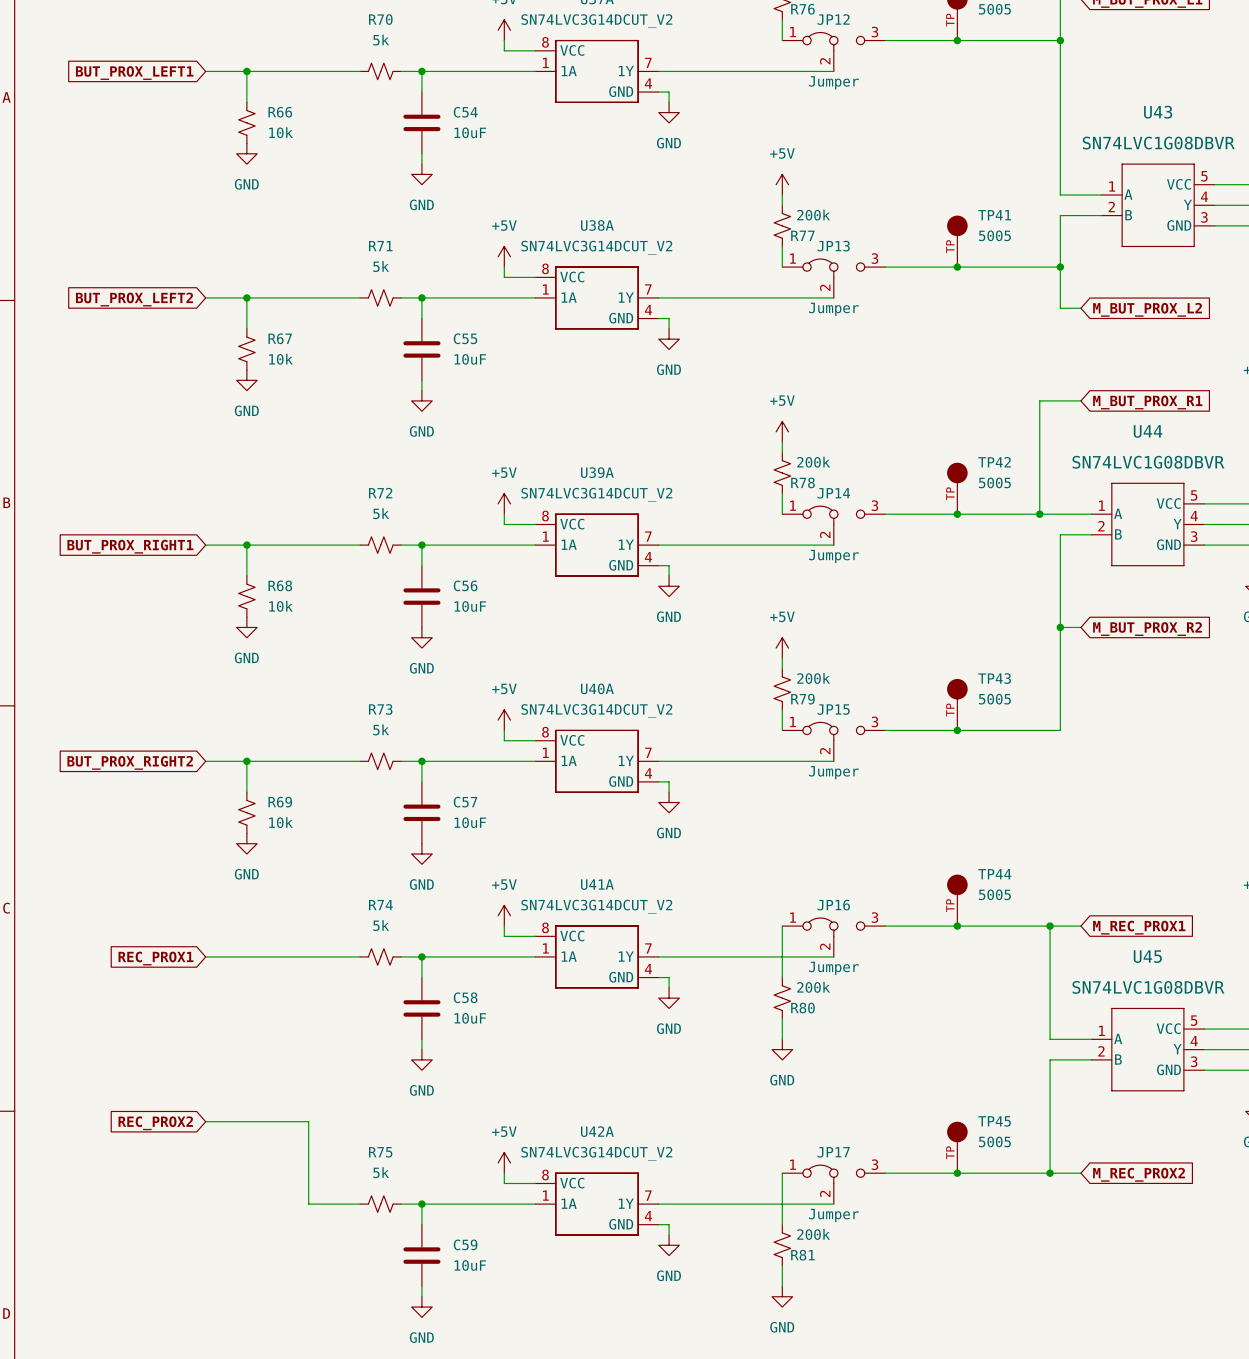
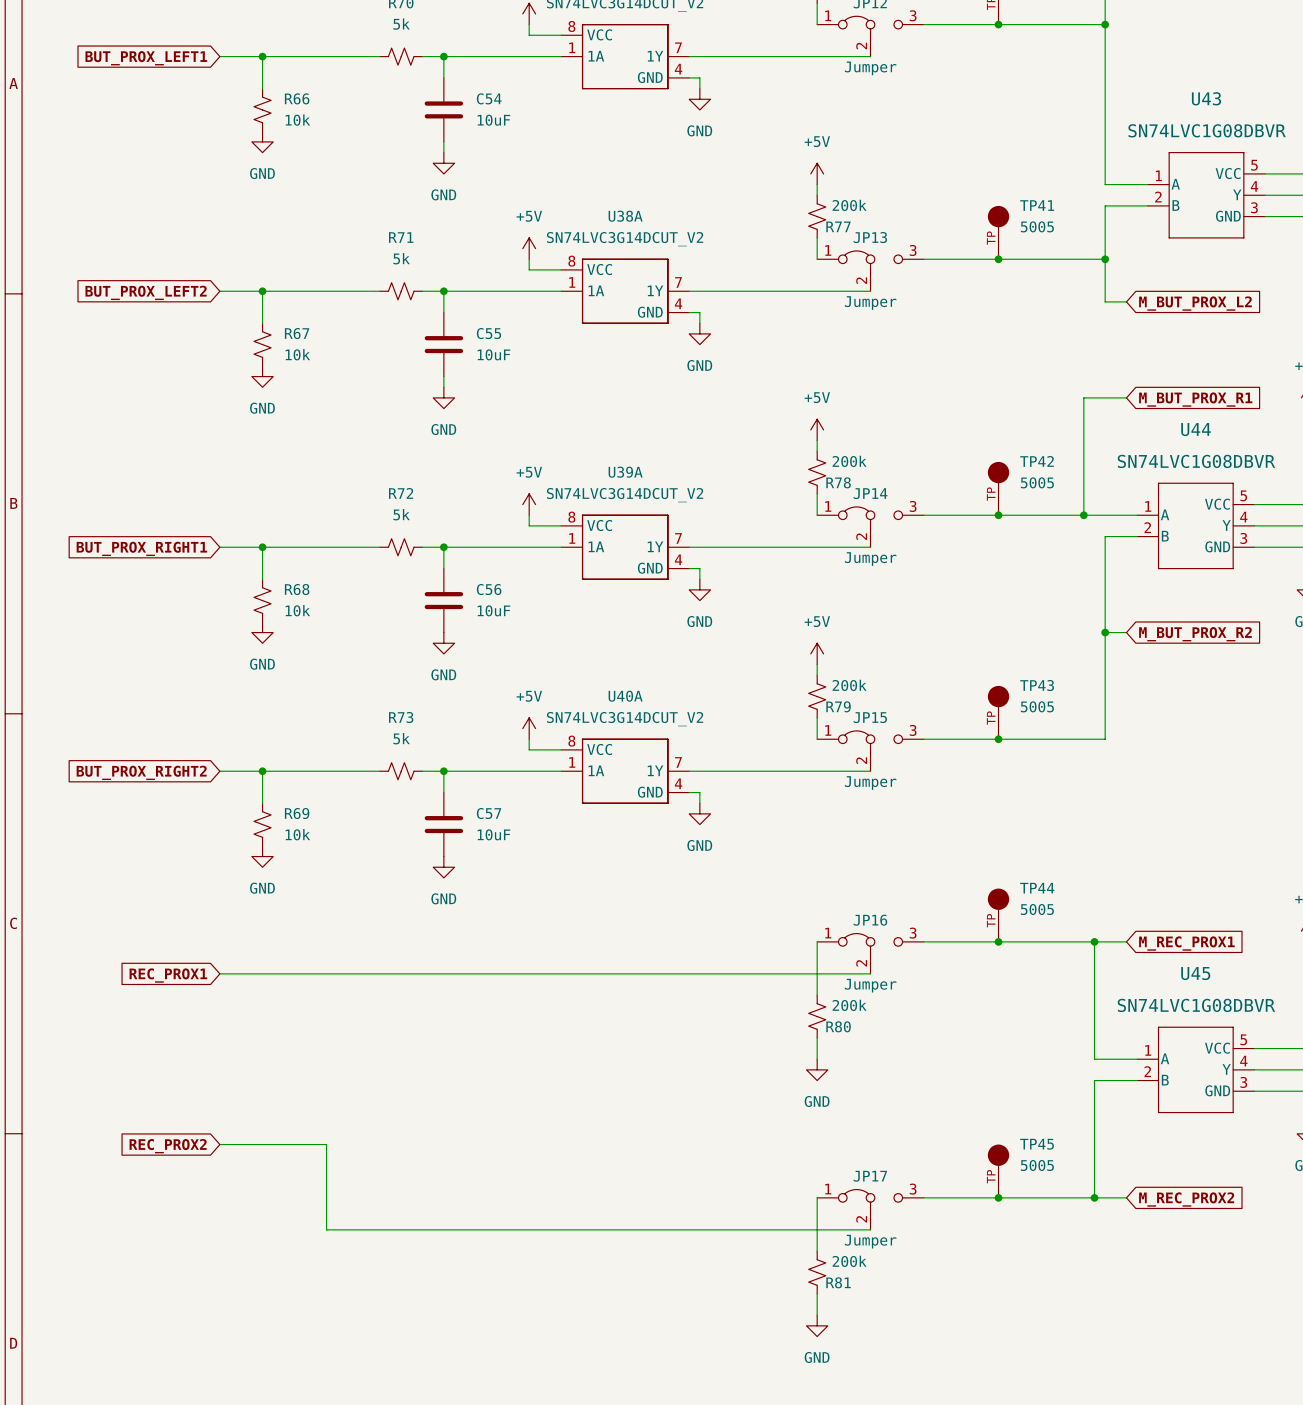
power symbol: +5V (504, 915) -> none
wire: (504, 926) (504, 936) (535, 936) -> none
R74: 5k (380, 956) -> none
wire: (421, 956) (421, 977) -> none
junction: (421, 956) -> none
wire: none -> (561, 973) (689, 973)
U41A: SN74LVC3G14DCUT_V2 (596, 956) -> none
wire: (658, 977) (669, 977) (669, 987) -> none
power symbol: GND (669, 998) -> none
C58: 10uF (421, 1008) -> none
wire: (421, 1039) (421, 1049) -> none
power symbol: GND (421, 1059) -> none
power symbol: +5V (504, 1162) -> none
wire: (504, 1173) (504, 1183) (535, 1183) -> none
R75: 5k (380, 1204) -> none
wire: (421, 1204) (421, 1224) -> none
junction: (421, 1204) -> none
wire: none -> (561, 1229) (689, 1229)
U42A: SN74LVC3G14DCUT_V2 (596, 1204) -> none
wire: (658, 1224) (669, 1224) (669, 1234) -> none
power symbol: GND (669, 1245) -> none
C59: 10uF (421, 1255) -> none
wire: (421, 1286) (421, 1296) -> none
power symbol: GND (421, 1307) -> none

